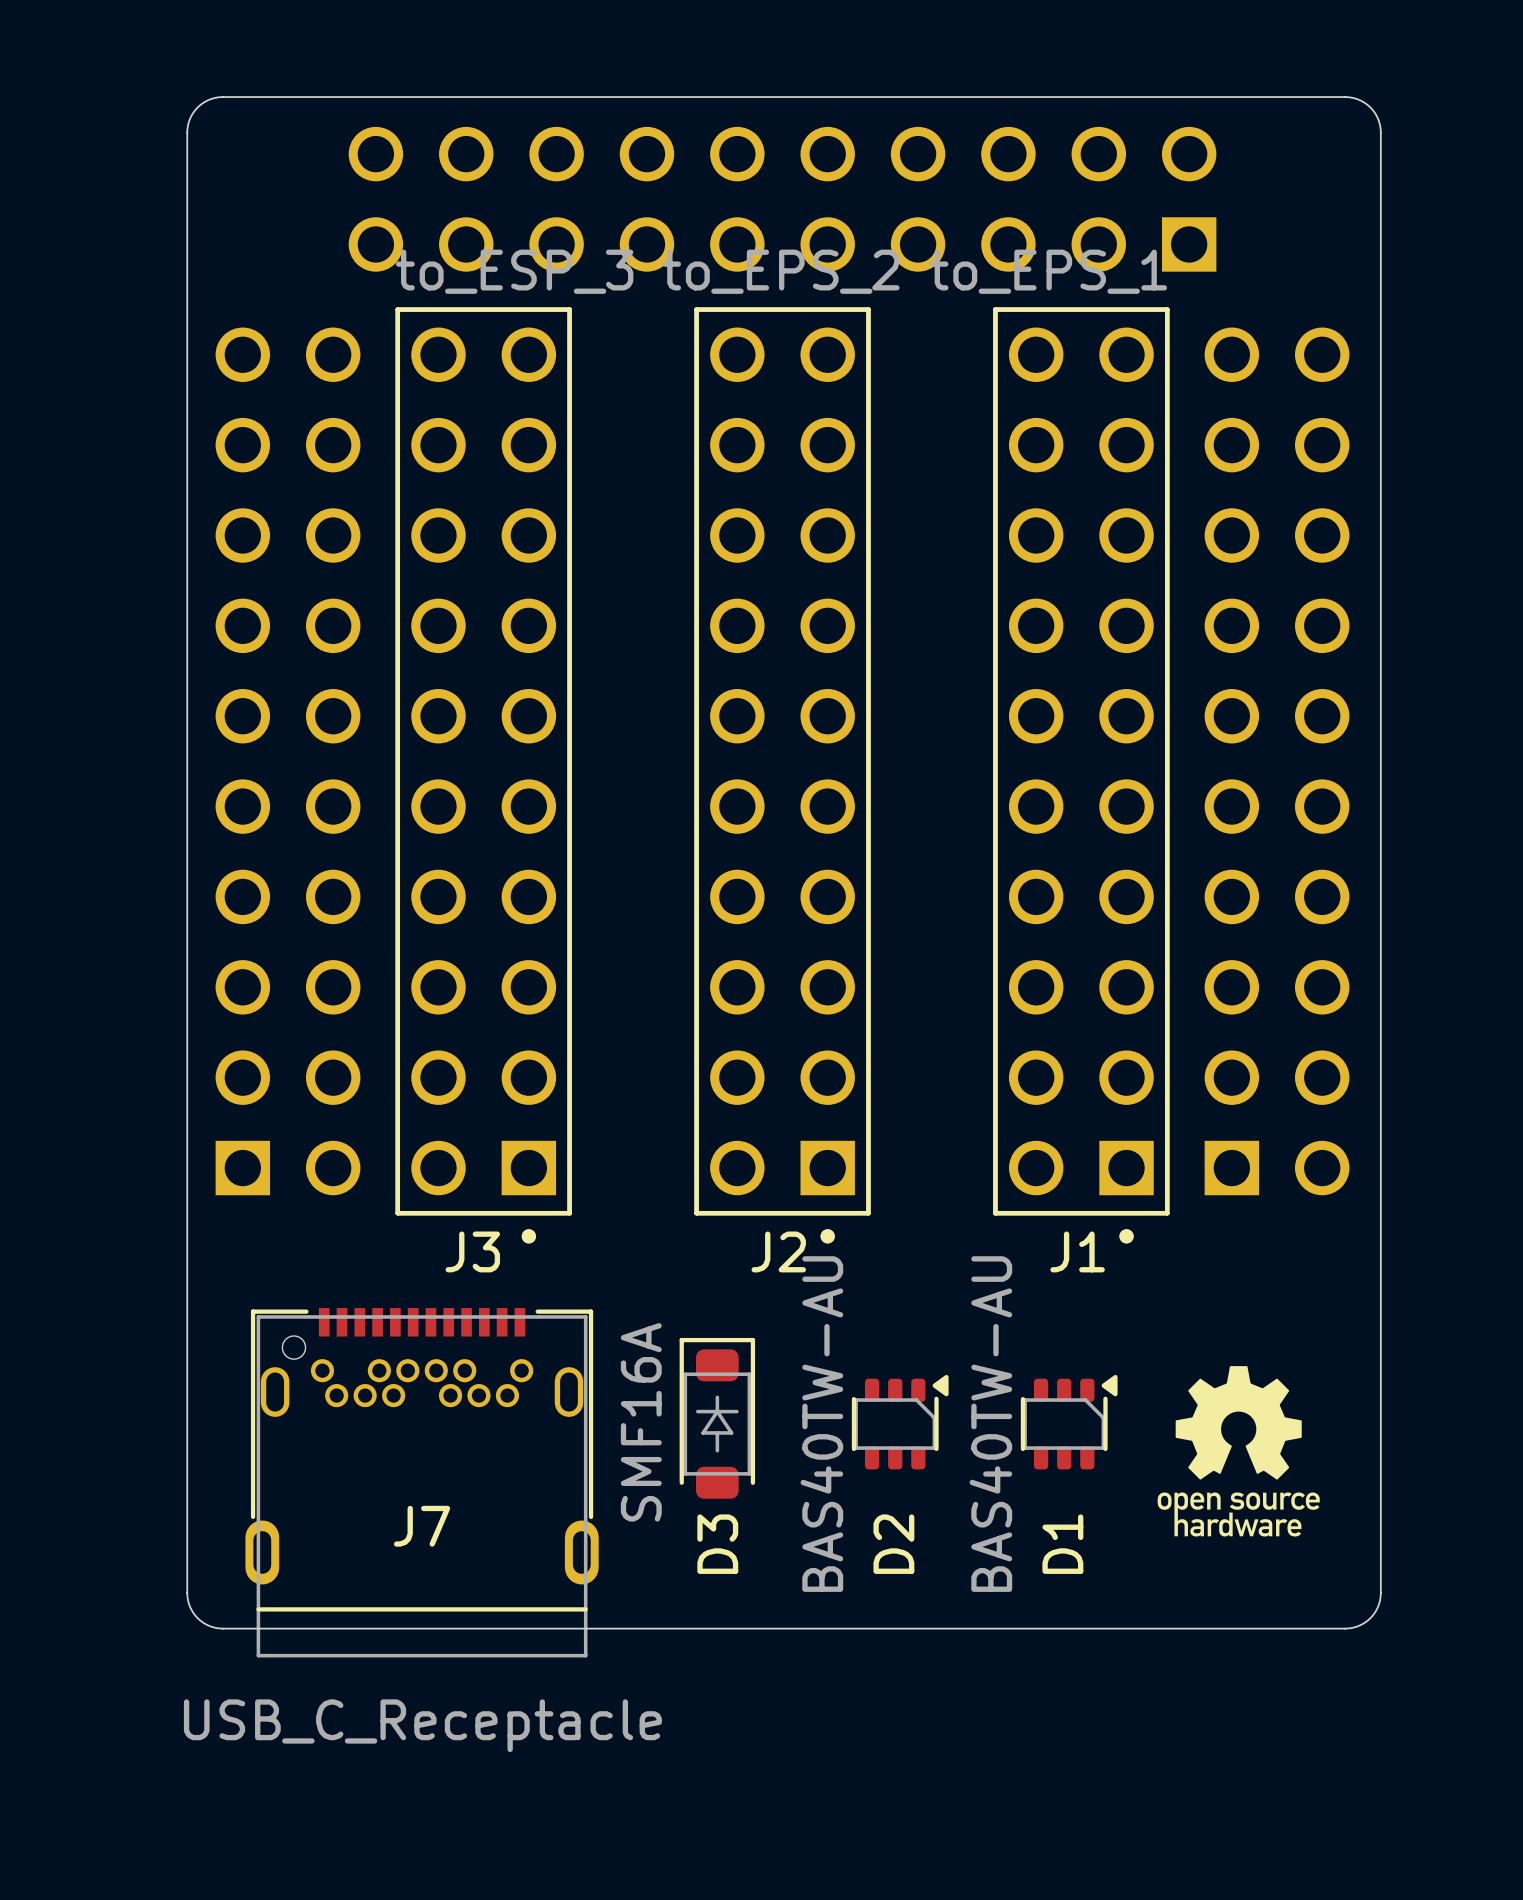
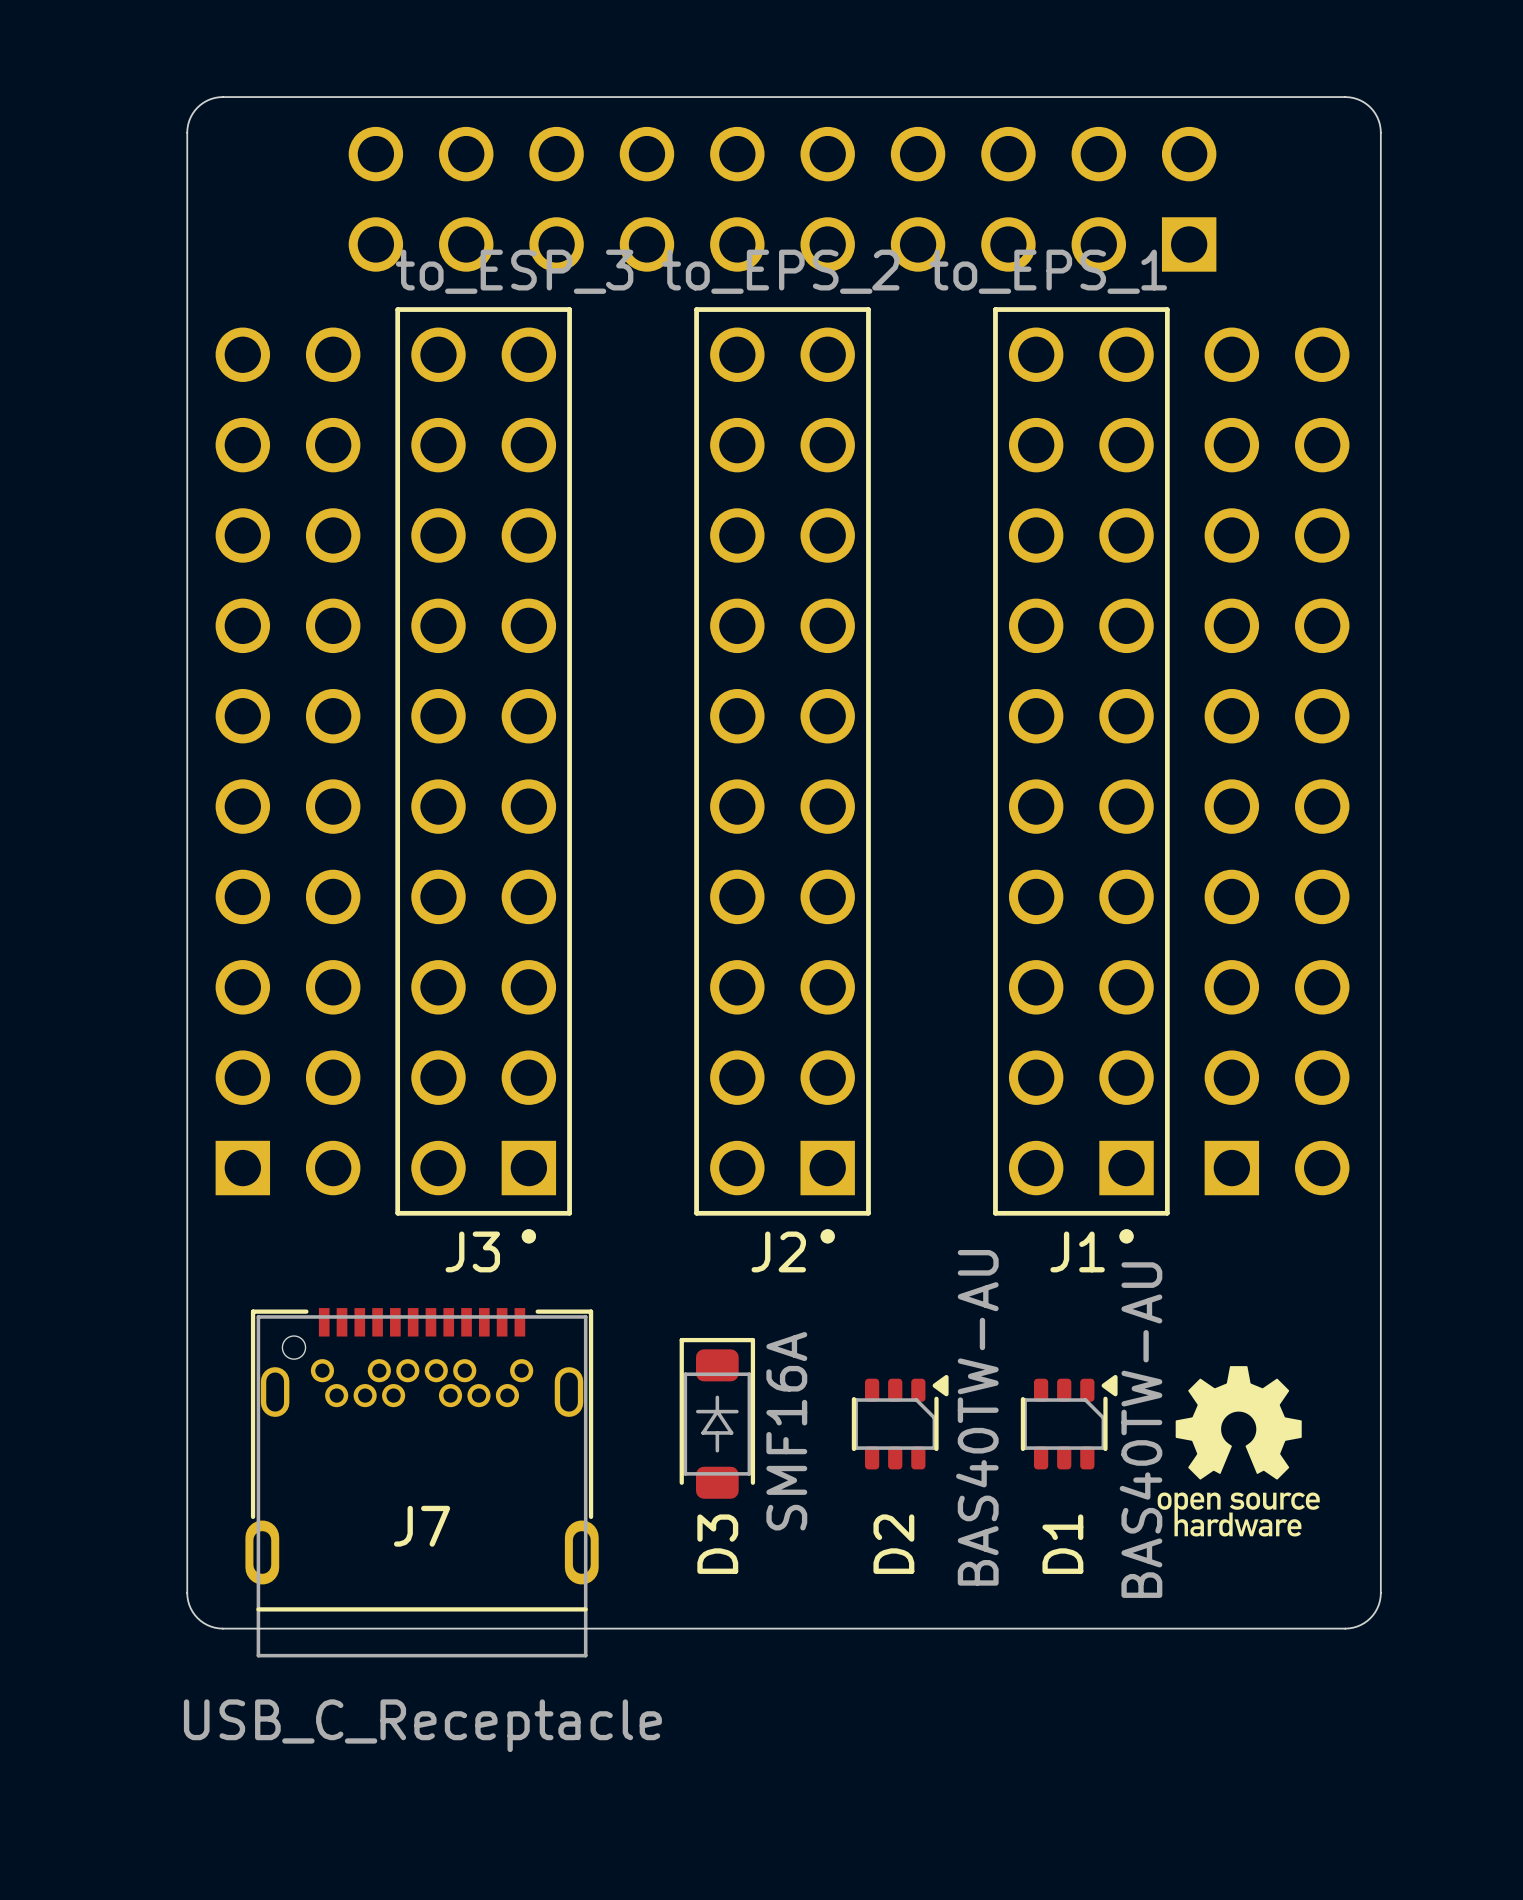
D3 value position: SMF16A (641, 1422) -> SMF16A (786, 1431)
D2 value position: BAS40TW-AU (821, 1424) -> BAS40TW-AU (977, 1417)
D1 value position: BAS40TW-AU (990, 1424) -> BAS40TW-AU (1141, 1430)

